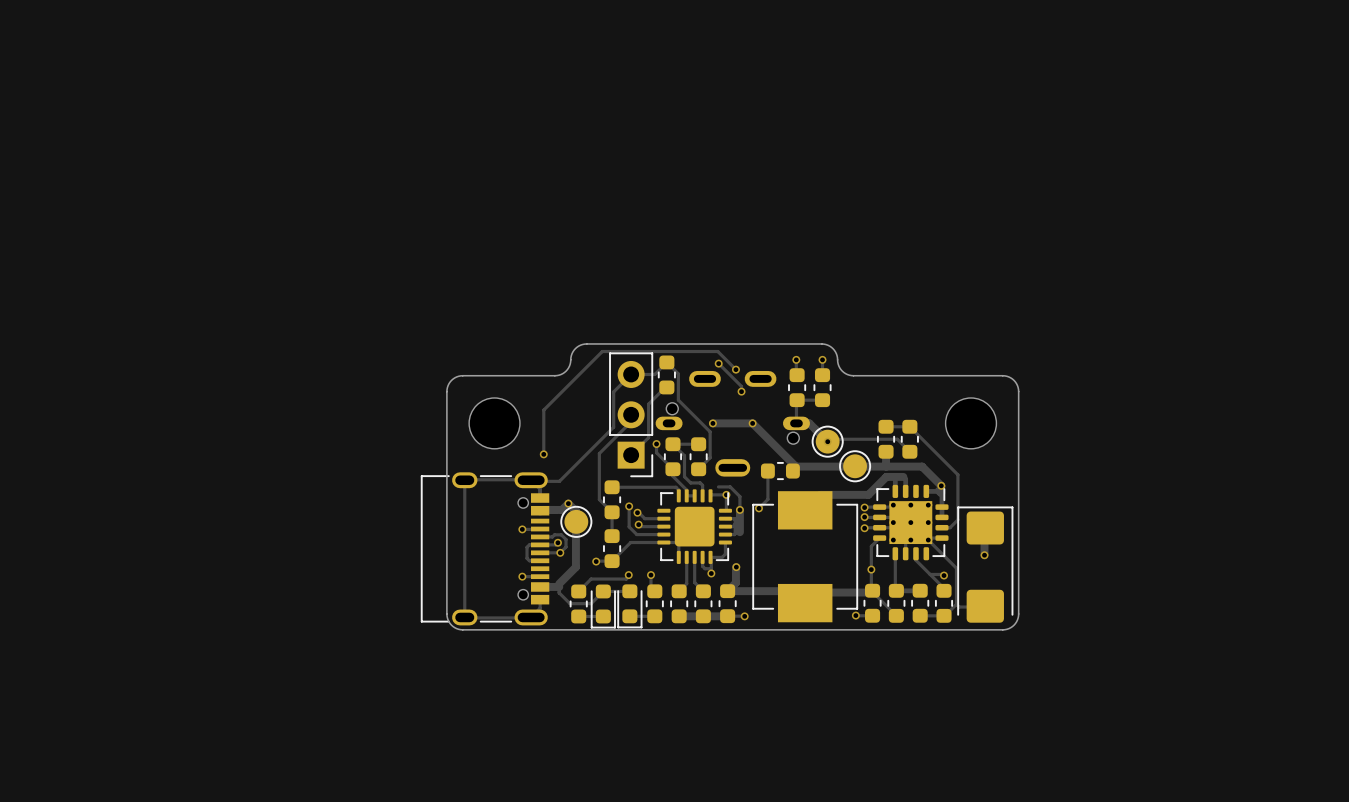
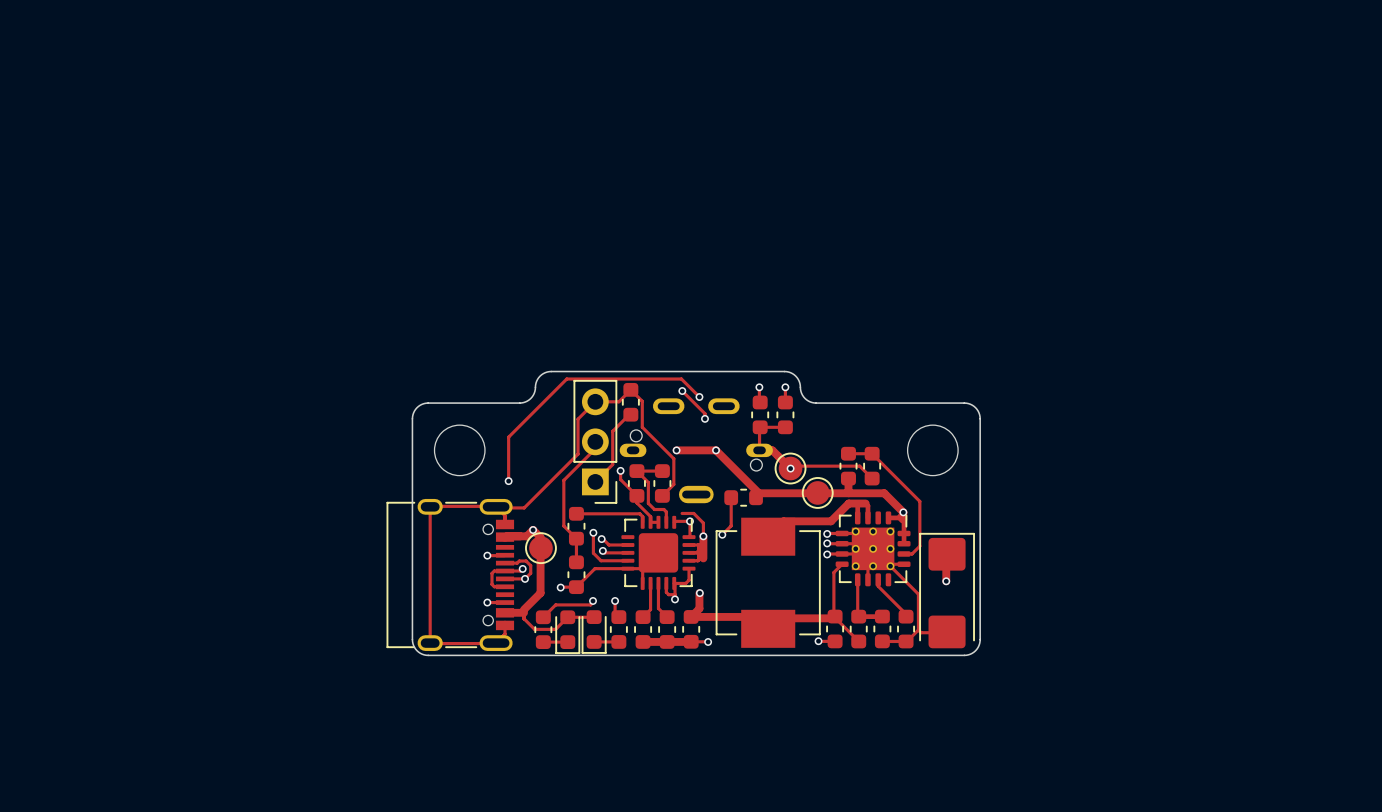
via: (871, 569) -> none
track: (930, 574) (944, 575) -> none
via: (944, 575) -> none

